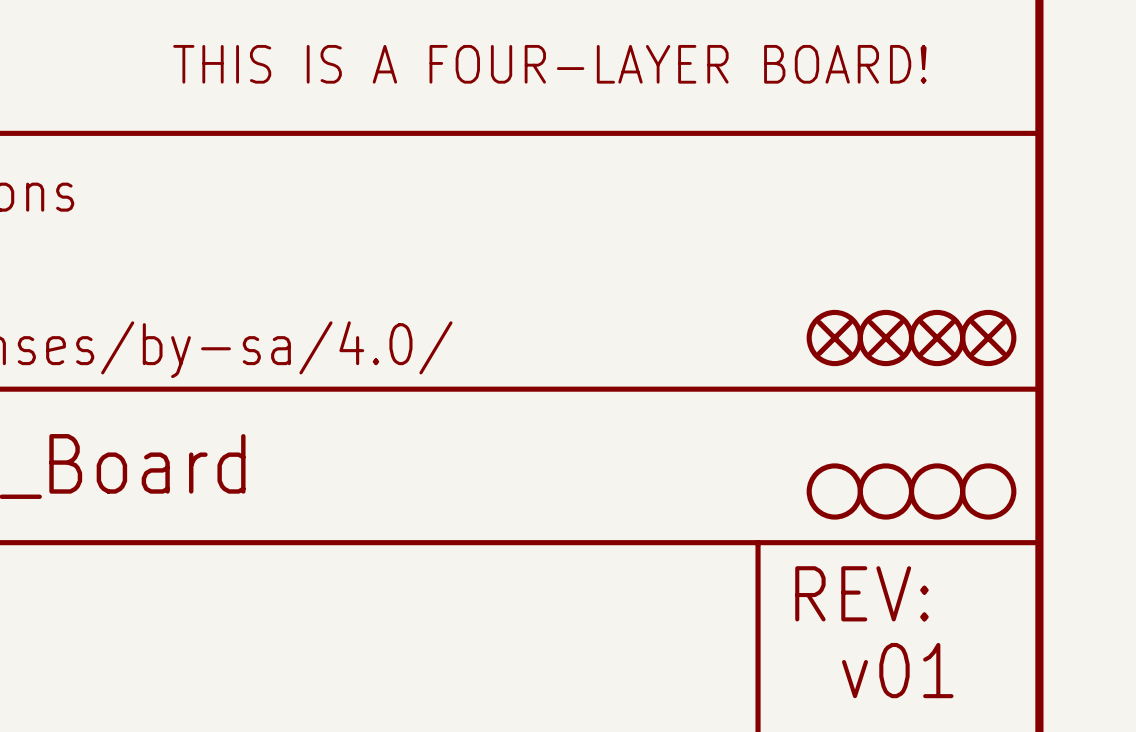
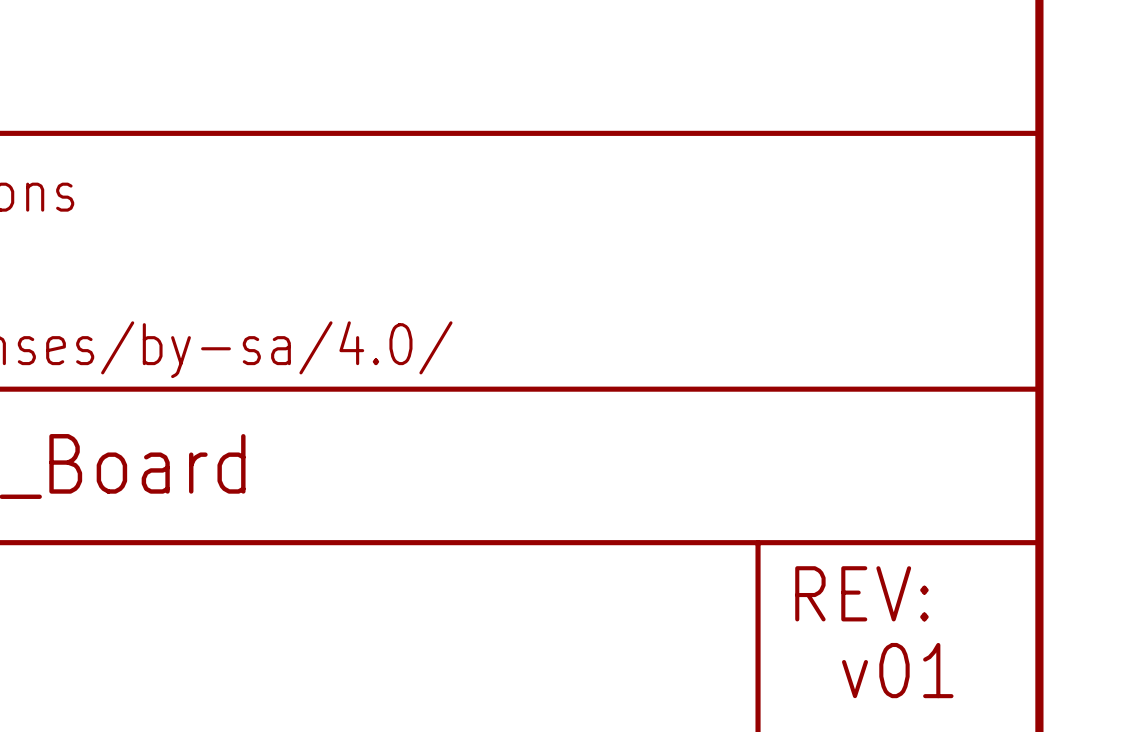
part: (549, 64) -> none
part: (834, 338) -> none
part: (885, 338) -> none
part: (937, 338) -> none
part: (988, 338) -> none
part: (834, 491) -> none
part: (885, 491) -> none
part: (937, 491) -> none
part: (988, 491) -> none

